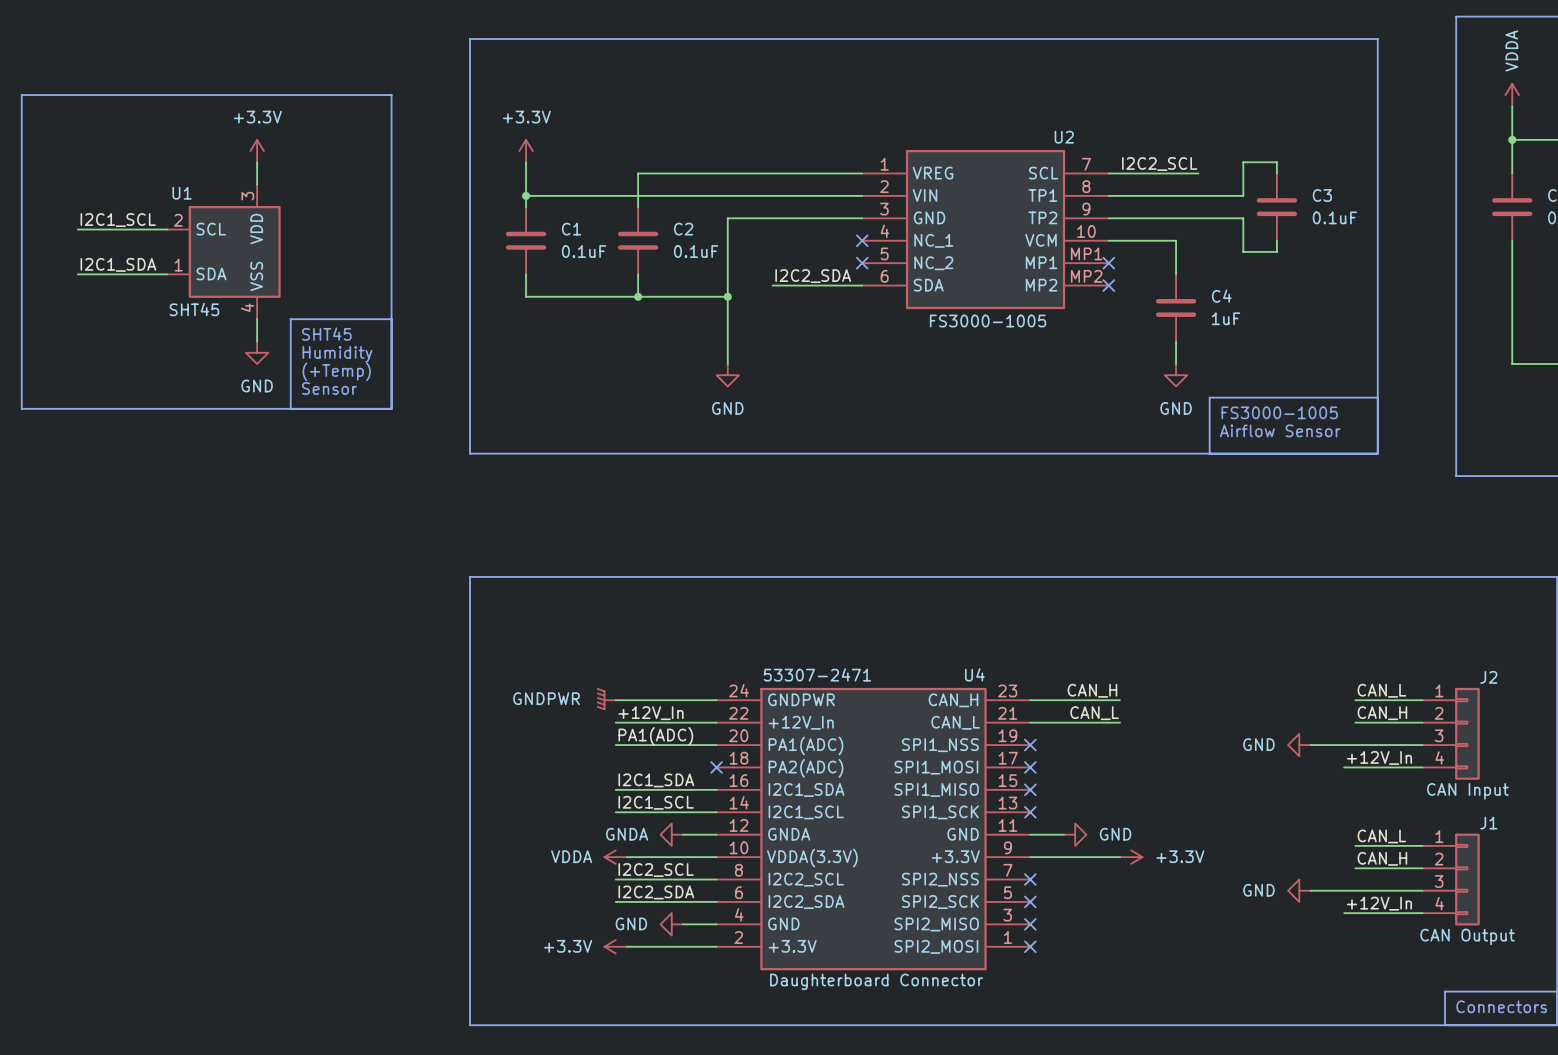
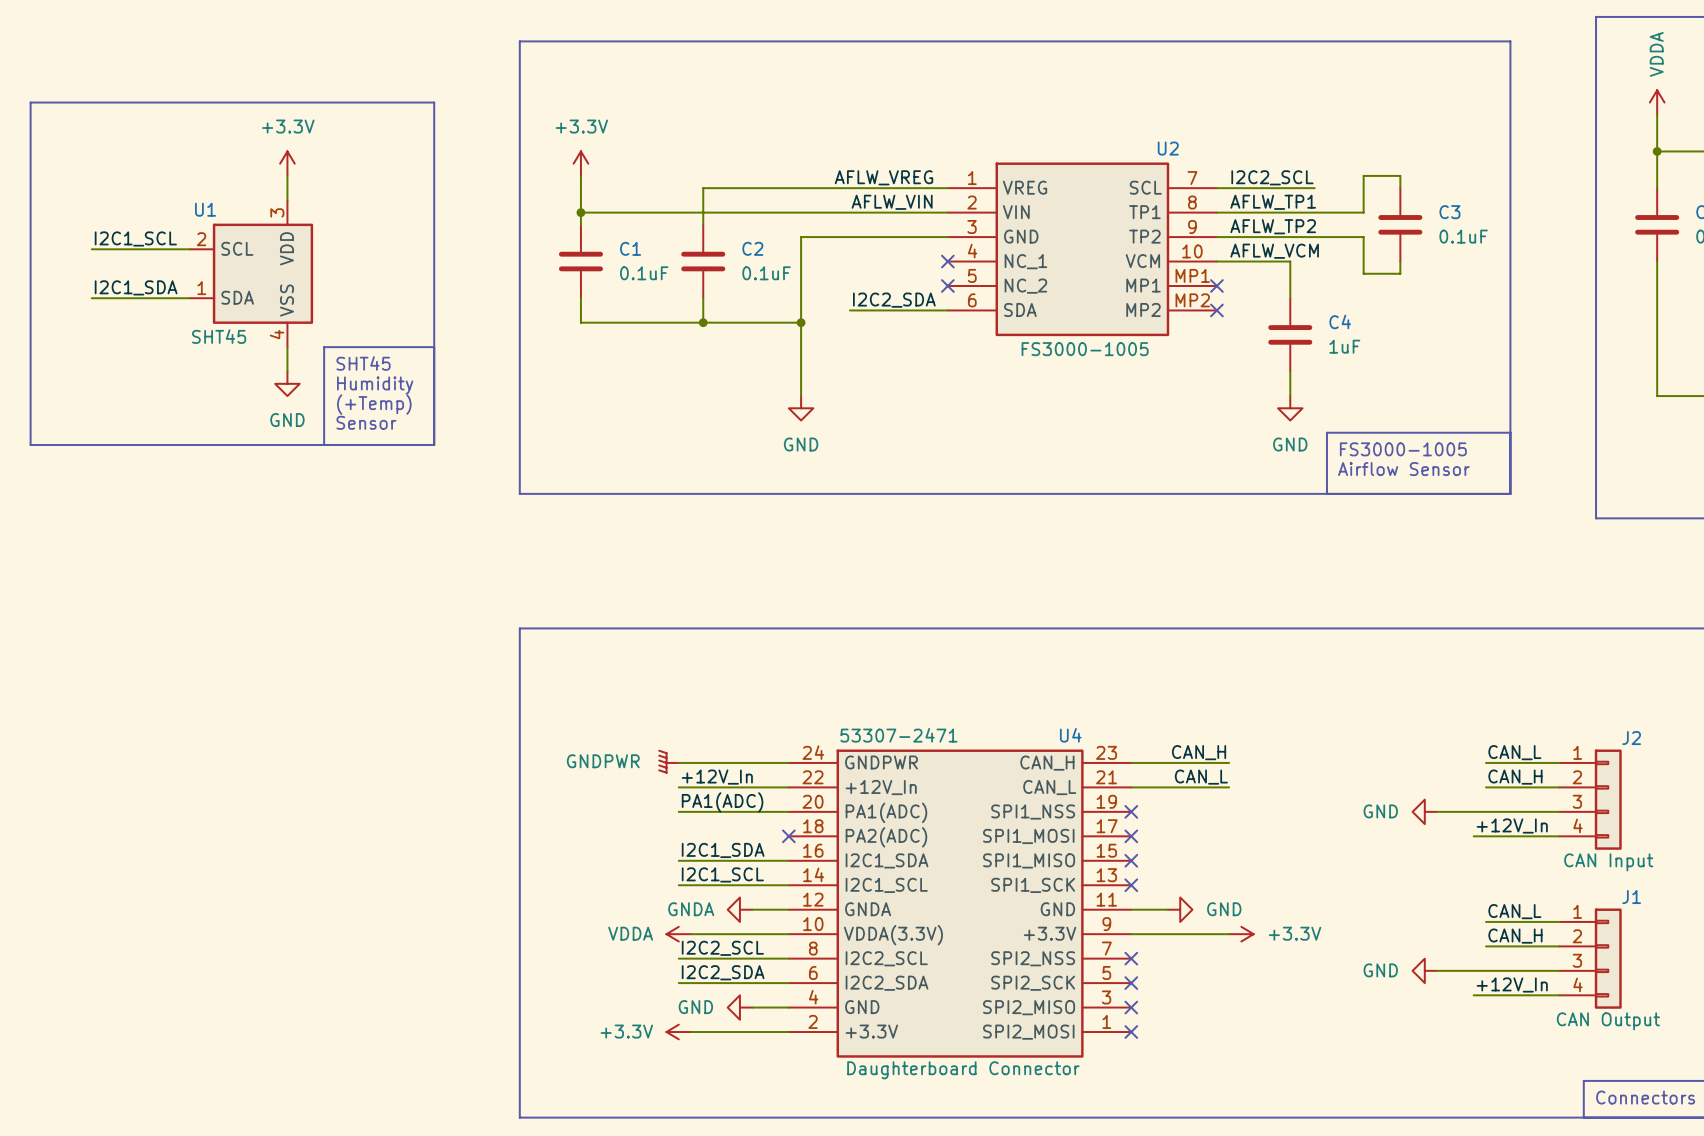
label: none -> AFLW_VREG (883, 177)
label: none -> AFLW_VIN (892, 202)
label: none -> AFLW_TP1 (1273, 202)
label: none -> AFLW_TP2 (1273, 226)
label: none -> AFLW_VCM (1274, 251)

